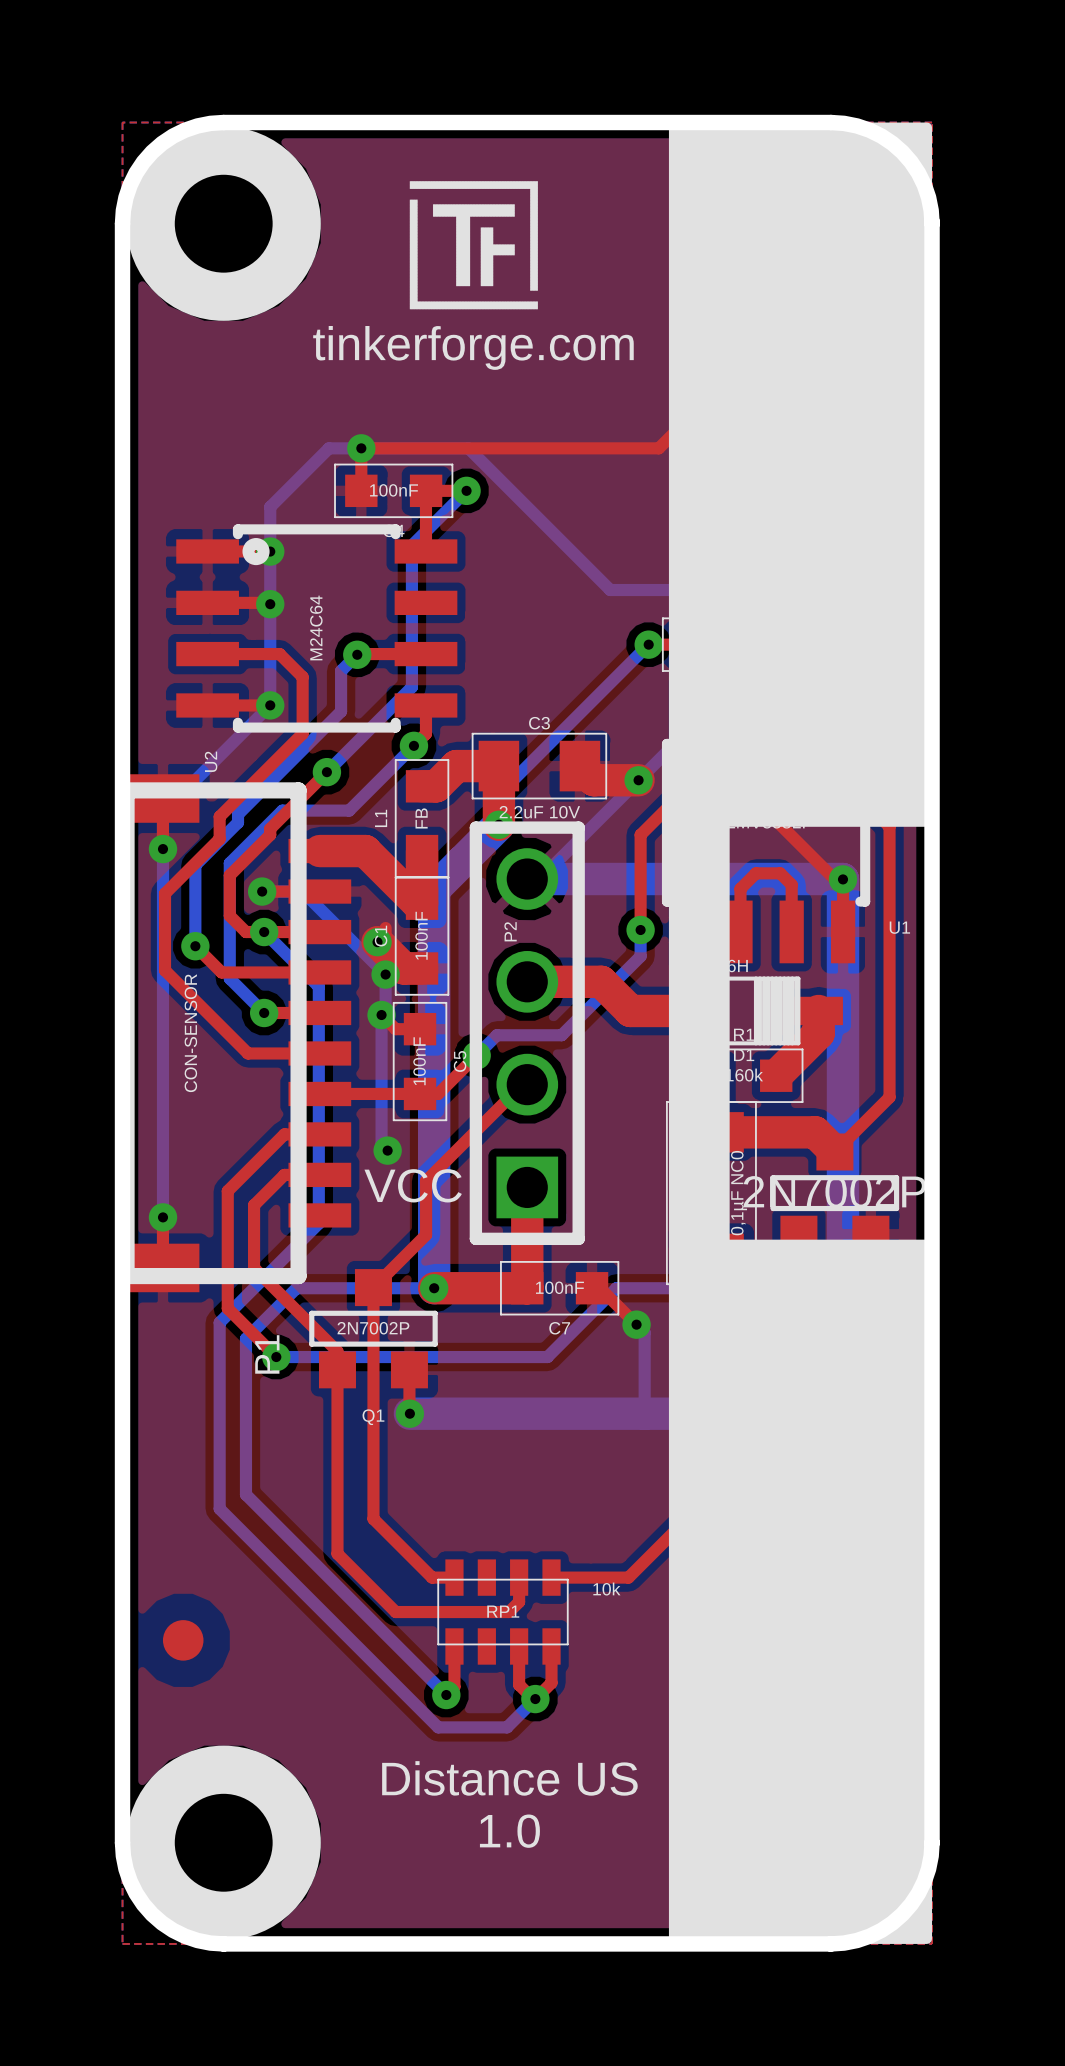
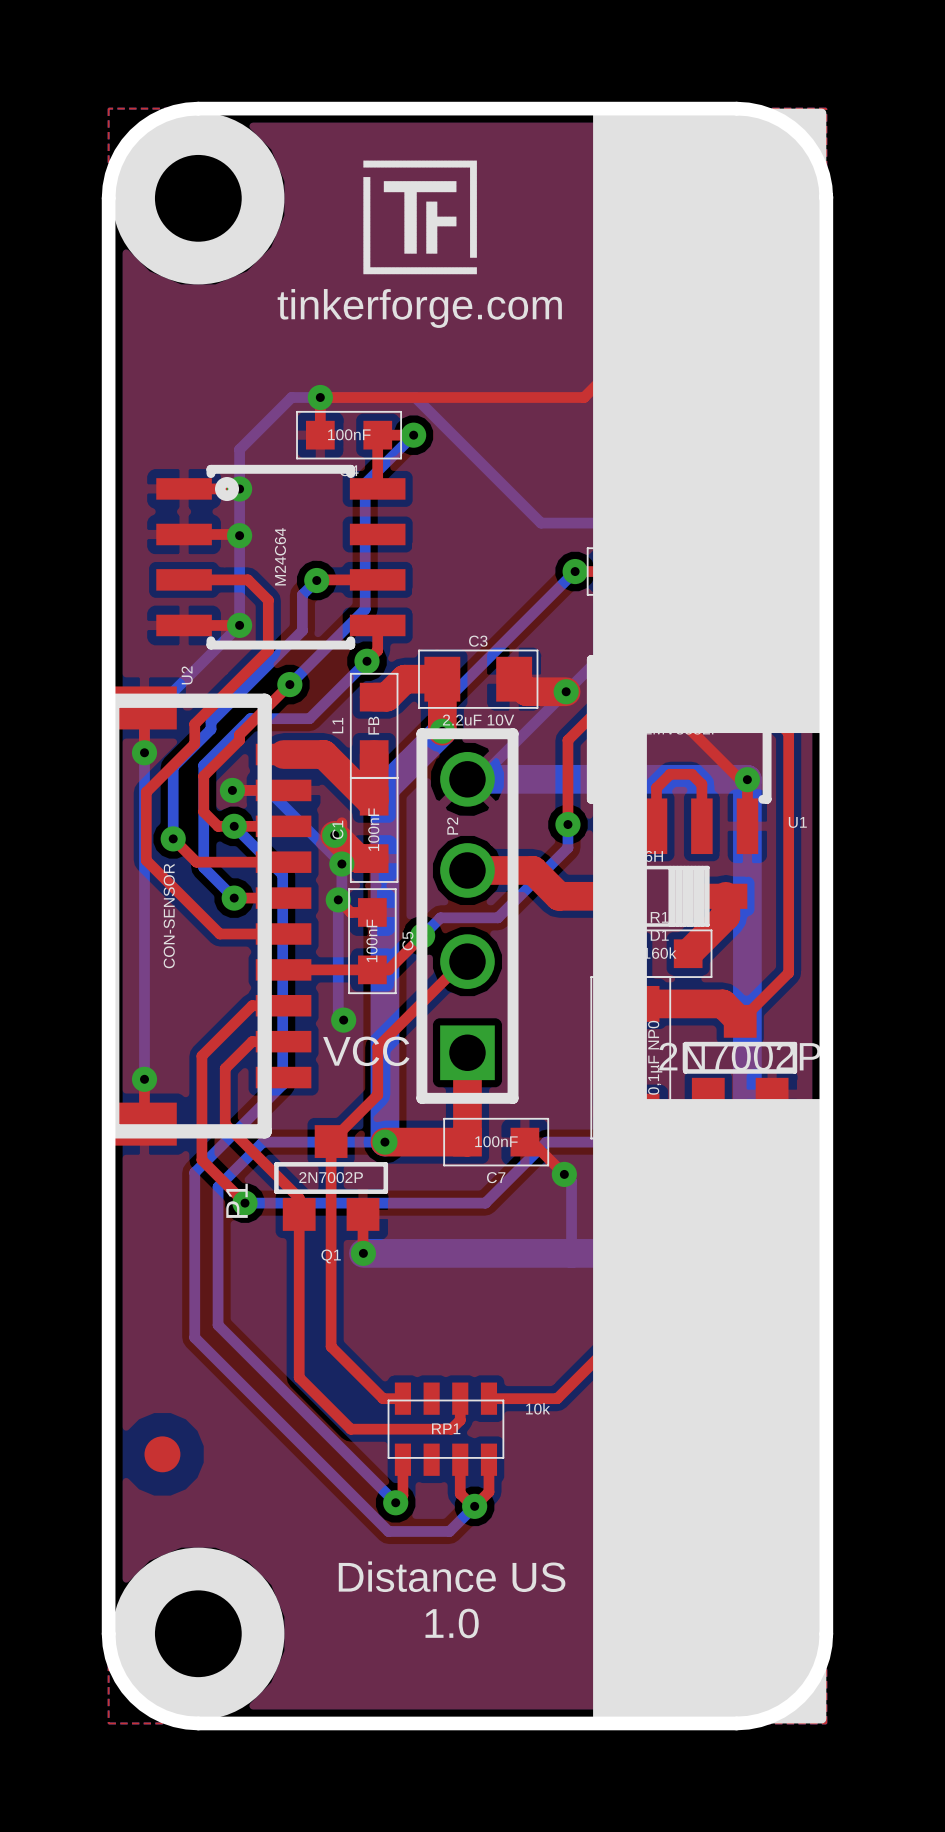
part value: 0,1µF NC0 (739, 1193) -> 0,1µF NP0 (655, 1057)

